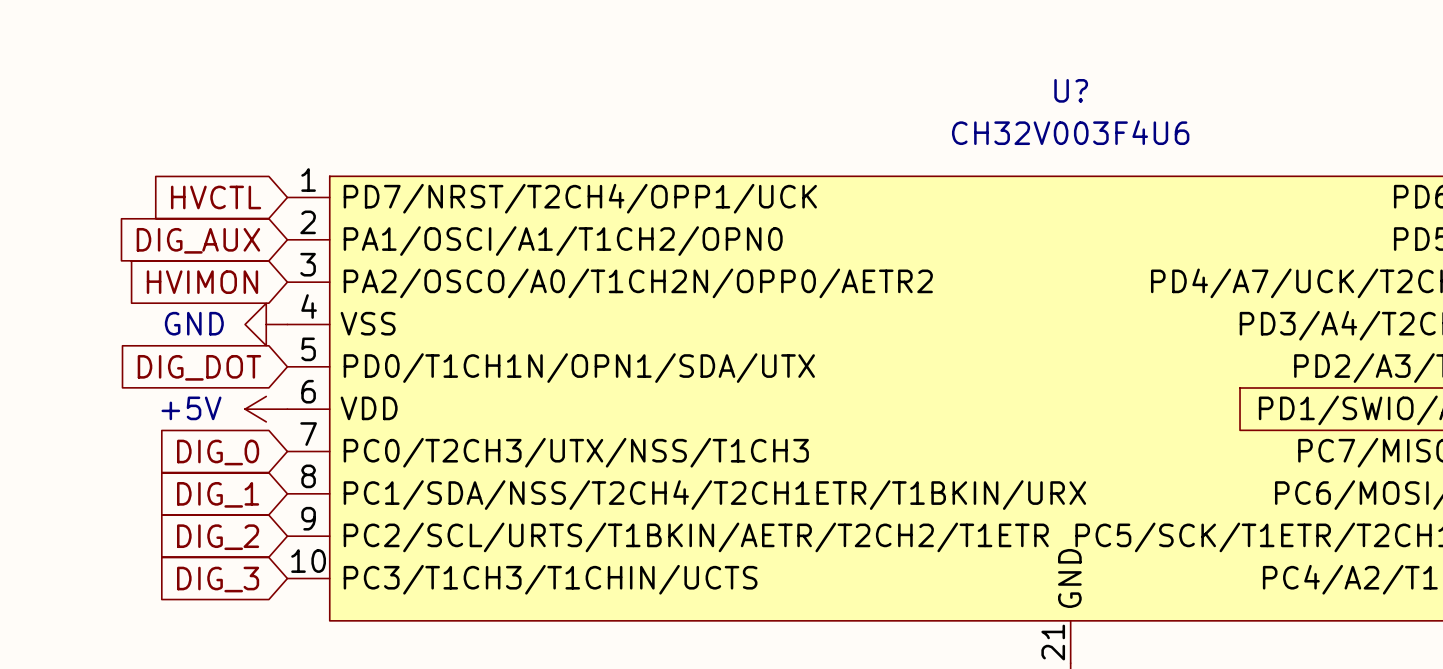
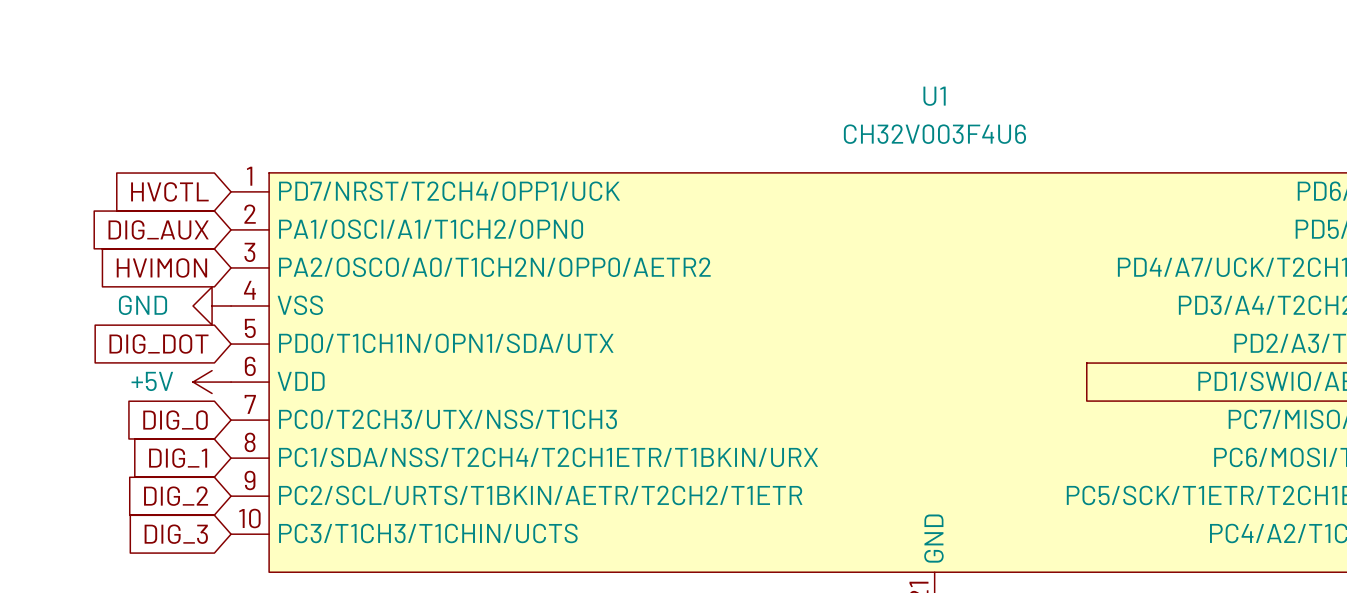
U? name: U? (1071, 90) -> U1 (934, 96)

